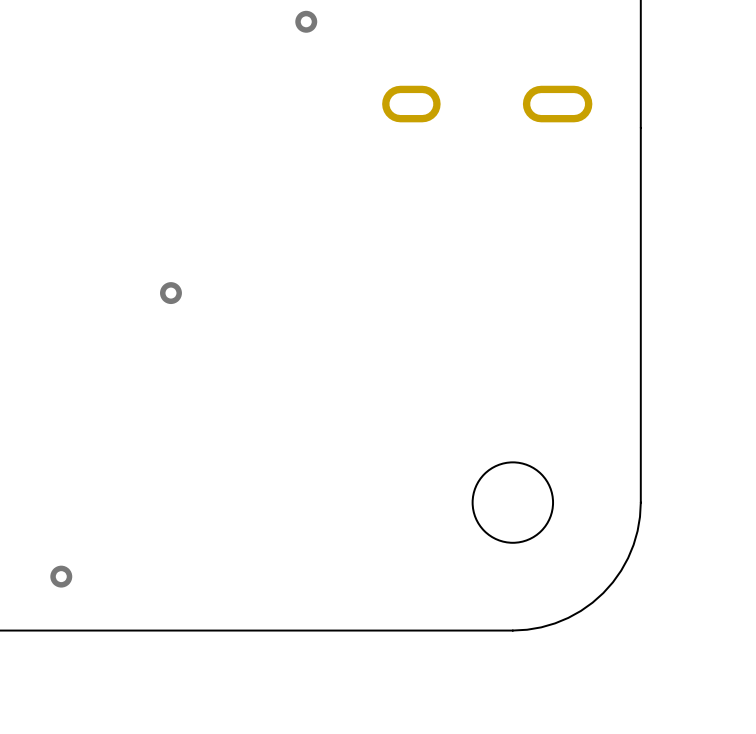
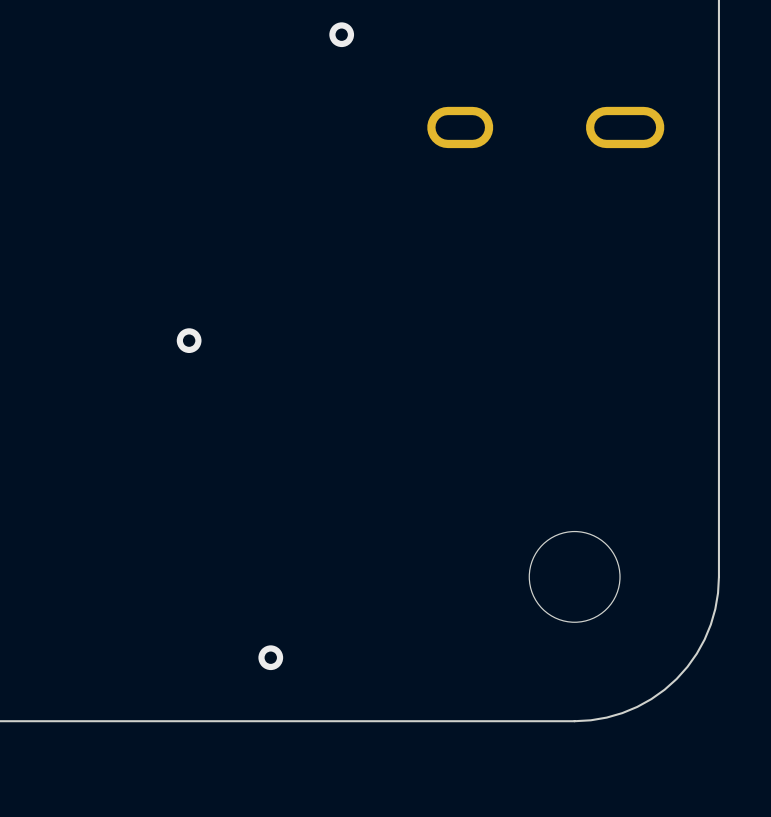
via position: (61, 576) -> (270, 657)

